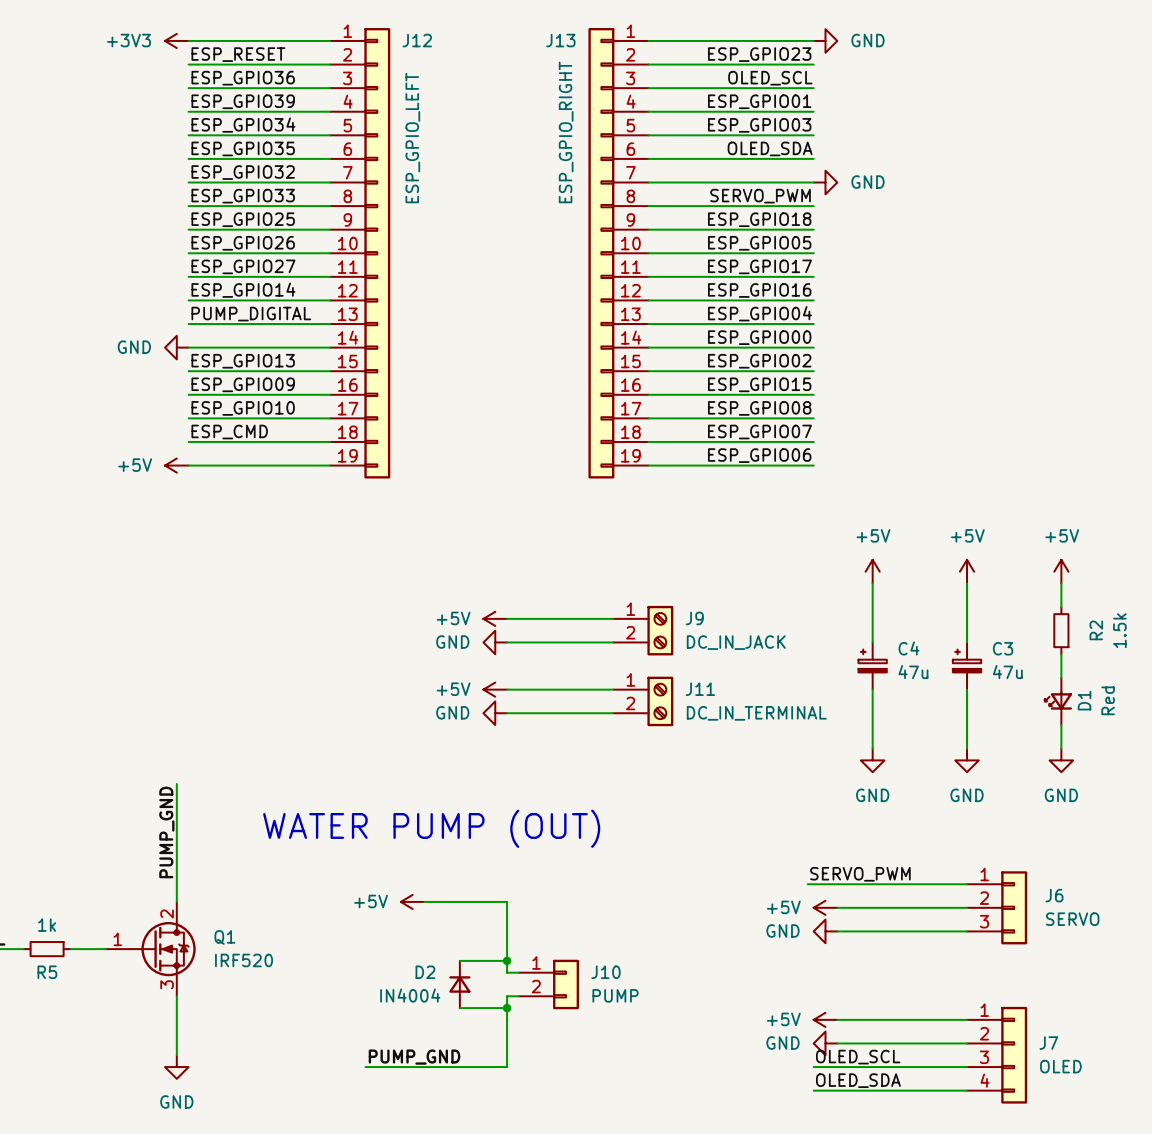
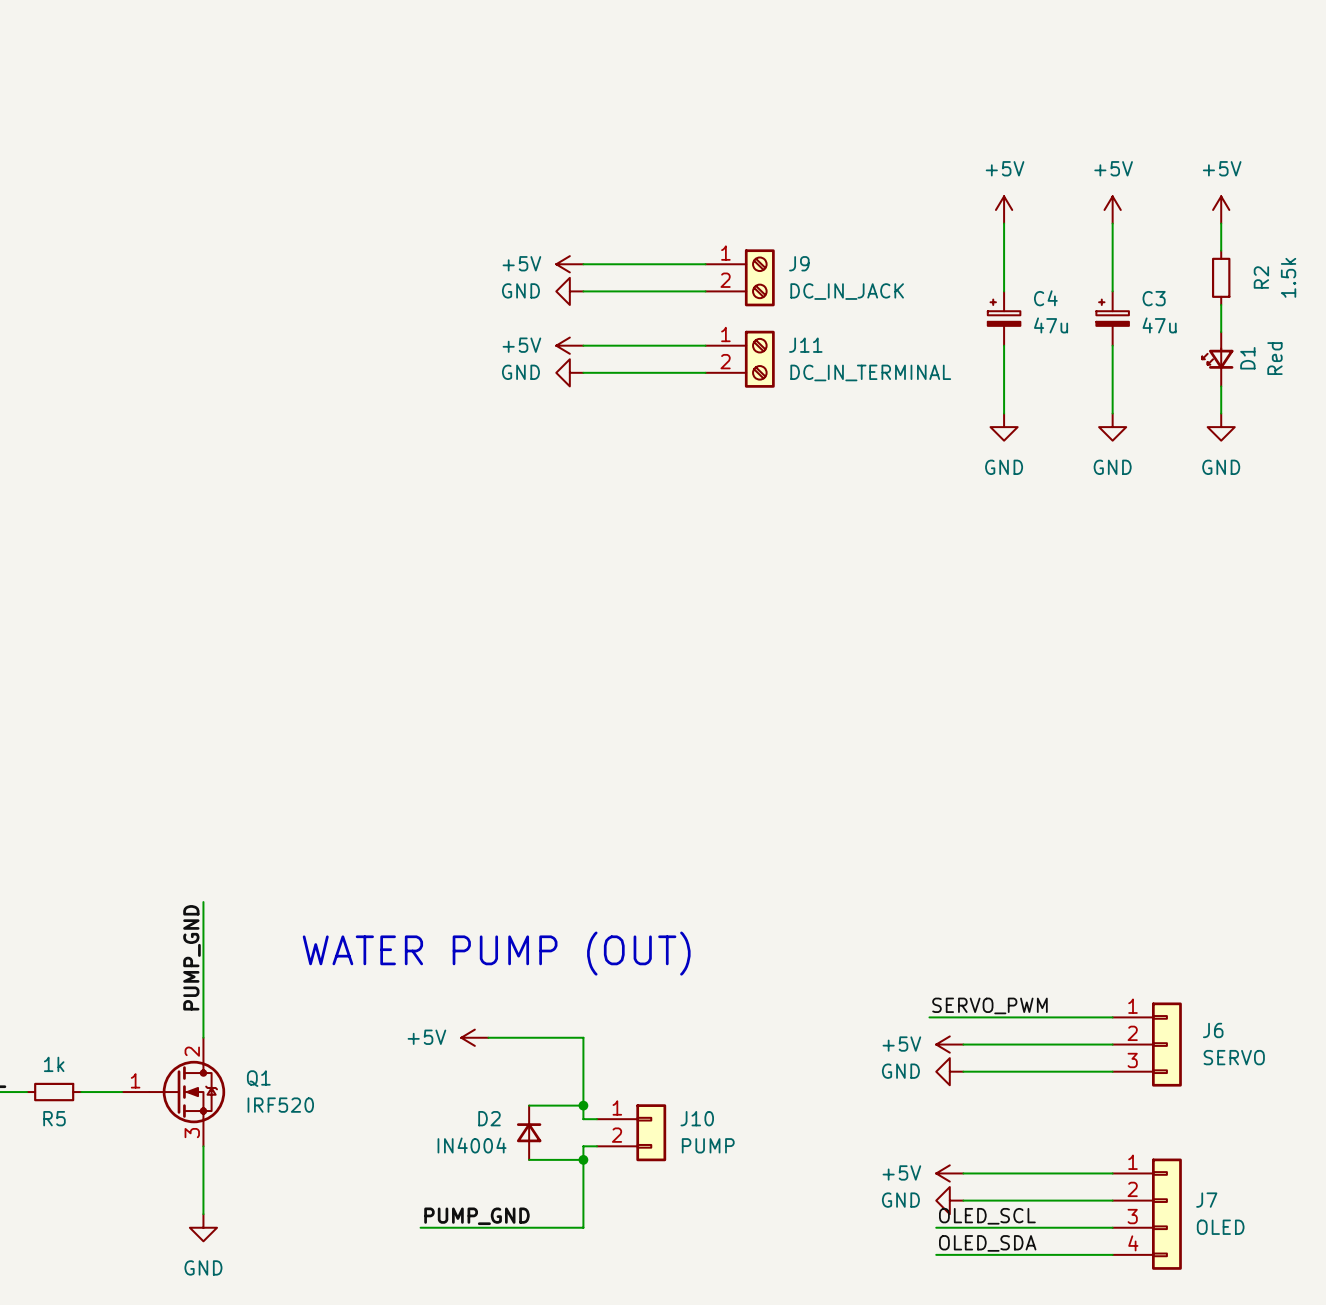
power symbol: +3V3 (176, 40) -> none
wire: (188, 40) (330, 40) -> none
wire: (648, 40) (813, 40) -> none
power symbol: GND (825, 40) -> none
label: ESP_RESET (238, 54) -> none
label: ESP_GPIO23 (759, 54) -> none
wire: (188, 64) (330, 64) -> none
wire: (648, 64) (813, 64) -> none
label: ESP_GPIO36 (243, 78) -> none
label: OLED_SCL (770, 78) -> none
wire: (188, 88) (330, 88) -> none
wire: (648, 88) (813, 88) -> none
label: ESP_GPIO39 (243, 101) -> none
label: ESP_GPIO01 (759, 101) -> none
wire: (188, 111) (330, 111) -> none
wire: (648, 111) (813, 111) -> none
label: ESP_GPIO34 (243, 125) -> none
label: ESP_GPIO03 (759, 125) -> none
wire: (188, 135) (330, 135) -> none
wire: (648, 135) (813, 135) -> none
label: ESP_GPIO35 (243, 148) -> none
label: OLED_SDA (770, 148) -> none
wire: (188, 158) (330, 158) -> none
wire: (648, 158) (813, 158) -> none
label: ESP_GPIO32 (243, 172) -> none
wire: (188, 182) (330, 182) -> none
wire: (648, 182) (813, 182) -> none
power symbol: GND (825, 182) -> none
power symbol: none -> +5V (1004, 209)
power symbol: none -> +5V (1112, 209)
power symbol: none -> +5V (1221, 209)
wire: none -> (1004, 223) (1004, 291)
wire: none -> (1112, 223) (1112, 291)
wire: none -> (1221, 223) (1221, 250)
label: ESP_GPIO33 (243, 196) -> none
label: SERVO_PWM (760, 196) -> none
wire: (188, 206) (330, 206) -> none
wire: (648, 206) (813, 206) -> none
label: ESP_GPIO25 (243, 219) -> none
label: ESP_GPIO18 (759, 219) -> none
wire: (188, 229) (330, 229) -> none
power symbol: none -> +5V (569, 264)
wire: none -> (583, 264) (705, 264)
wire: (648, 229) (813, 229) -> none
label: ESP_GPIO26 (243, 243) -> none
label: ESP_GPIO05 (759, 243) -> none
wire: (188, 253) (330, 253) -> none
J12: ESP_GPIO_LEFT (360, 253) -> none
power symbol: none -> GND (569, 291)
wire: none -> (583, 291) (705, 291)
J13: ESP_GPIO_RIGHT (618, 253) -> none
wire: (648, 253) (813, 253) -> none
wire: none -> (1221, 304) (1221, 332)
label: ESP_GPIO27 (243, 266) -> none
label: ESP_GPIO17 (759, 266) -> none
wire: (188, 276) (330, 276) -> none
wire: (648, 276) (813, 276) -> none
label: ESP_GPIO14 (243, 290) -> none
label: ESP_GPIO16 (759, 290) -> none
wire: (188, 300) (330, 300) -> none
power symbol: none -> +5V (569, 345)
wire: none -> (583, 345) (705, 345)
wire: (648, 300) (813, 300) -> none
wire: none -> (1004, 345) (1004, 413)
wire: none -> (1112, 345) (1112, 413)
label: ESP_GPIO04 (759, 313) -> none
label: PUMP_DIGITAL (251, 314) -> none
wire: (188, 324) (330, 324) -> none
power symbol: none -> GND (569, 372)
wire: none -> (583, 372) (705, 372)
wire: (648, 324) (813, 324) -> none
wire: none -> (1221, 386) (1221, 413)
label: ESP_GPIO00 (759, 337) -> none
power symbol: GND (176, 347) -> none
wire: (188, 347) (330, 347) -> none
wire: (648, 347) (813, 347) -> none
label: ESP_GPIO13 (243, 361) -> none
label: ESP_GPIO02 (759, 361) -> none
wire: (188, 371) (330, 371) -> none
wire: (648, 371) (813, 371) -> none
power symbol: none -> GND (1004, 427)
power symbol: none -> GND (1112, 427)
power symbol: none -> GND (1221, 427)
label: ESP_GPIO09 (243, 384) -> none
label: ESP_GPIO15 (759, 384) -> none
wire: (188, 394) (330, 394) -> none
wire: (648, 394) (813, 394) -> none
label: ESP_GPIO10 (243, 408) -> none
label: ESP_GPIO08 (759, 408) -> none
wire: (188, 418) (330, 418) -> none
wire: (648, 418) (813, 418) -> none
label: ESP_CMD (229, 432) -> none
label: ESP_GPIO07 (759, 432) -> none
wire: (188, 441) (330, 441) -> none
wire: (648, 441) (813, 441) -> none
label: ESP_GPIO06 (759, 455) -> none
power symbol: +5V (176, 465) -> none
wire: (188, 465) (330, 465) -> none
wire: (648, 465) (813, 465) -> none
power symbol: +5V (872, 571) -> none
power symbol: +5V (967, 571) -> none
power symbol: +5V (1061, 571) -> none
wire: (872, 583) (872, 642) -> none
wire: (967, 583) (967, 642) -> none
wire: (1061, 583) (1061, 607) -> none
power symbol: +5V (495, 618) -> none
wire: (507, 618) (613, 618) -> none
J9 position: (643, 630) -> (740, 277)
R2 position: (1061, 630) -> (1221, 277)
power symbol: GND (495, 642) -> none
wire: (507, 642) (613, 642) -> none
wire: (1061, 654) (1061, 677) -> none
C4 position: (872, 666) -> (1004, 318)
C3 position: (967, 666) -> (1112, 318)
power symbol: +5V (495, 689) -> none
wire: (507, 689) (613, 689) -> none
wire: (872, 689) (872, 748) -> none
wire: (967, 689) (967, 748) -> none
J11 position: (643, 701) -> (740, 359)
D1 position: (1058, 701) -> (1217, 359)
power symbol: GND (495, 713) -> none
wire: (507, 713) (613, 713) -> none
wire: (1061, 725) (1061, 748) -> none
power symbol: GND (872, 760) -> none
power symbol: GND (967, 760) -> none
power symbol: GND (1061, 760) -> none

